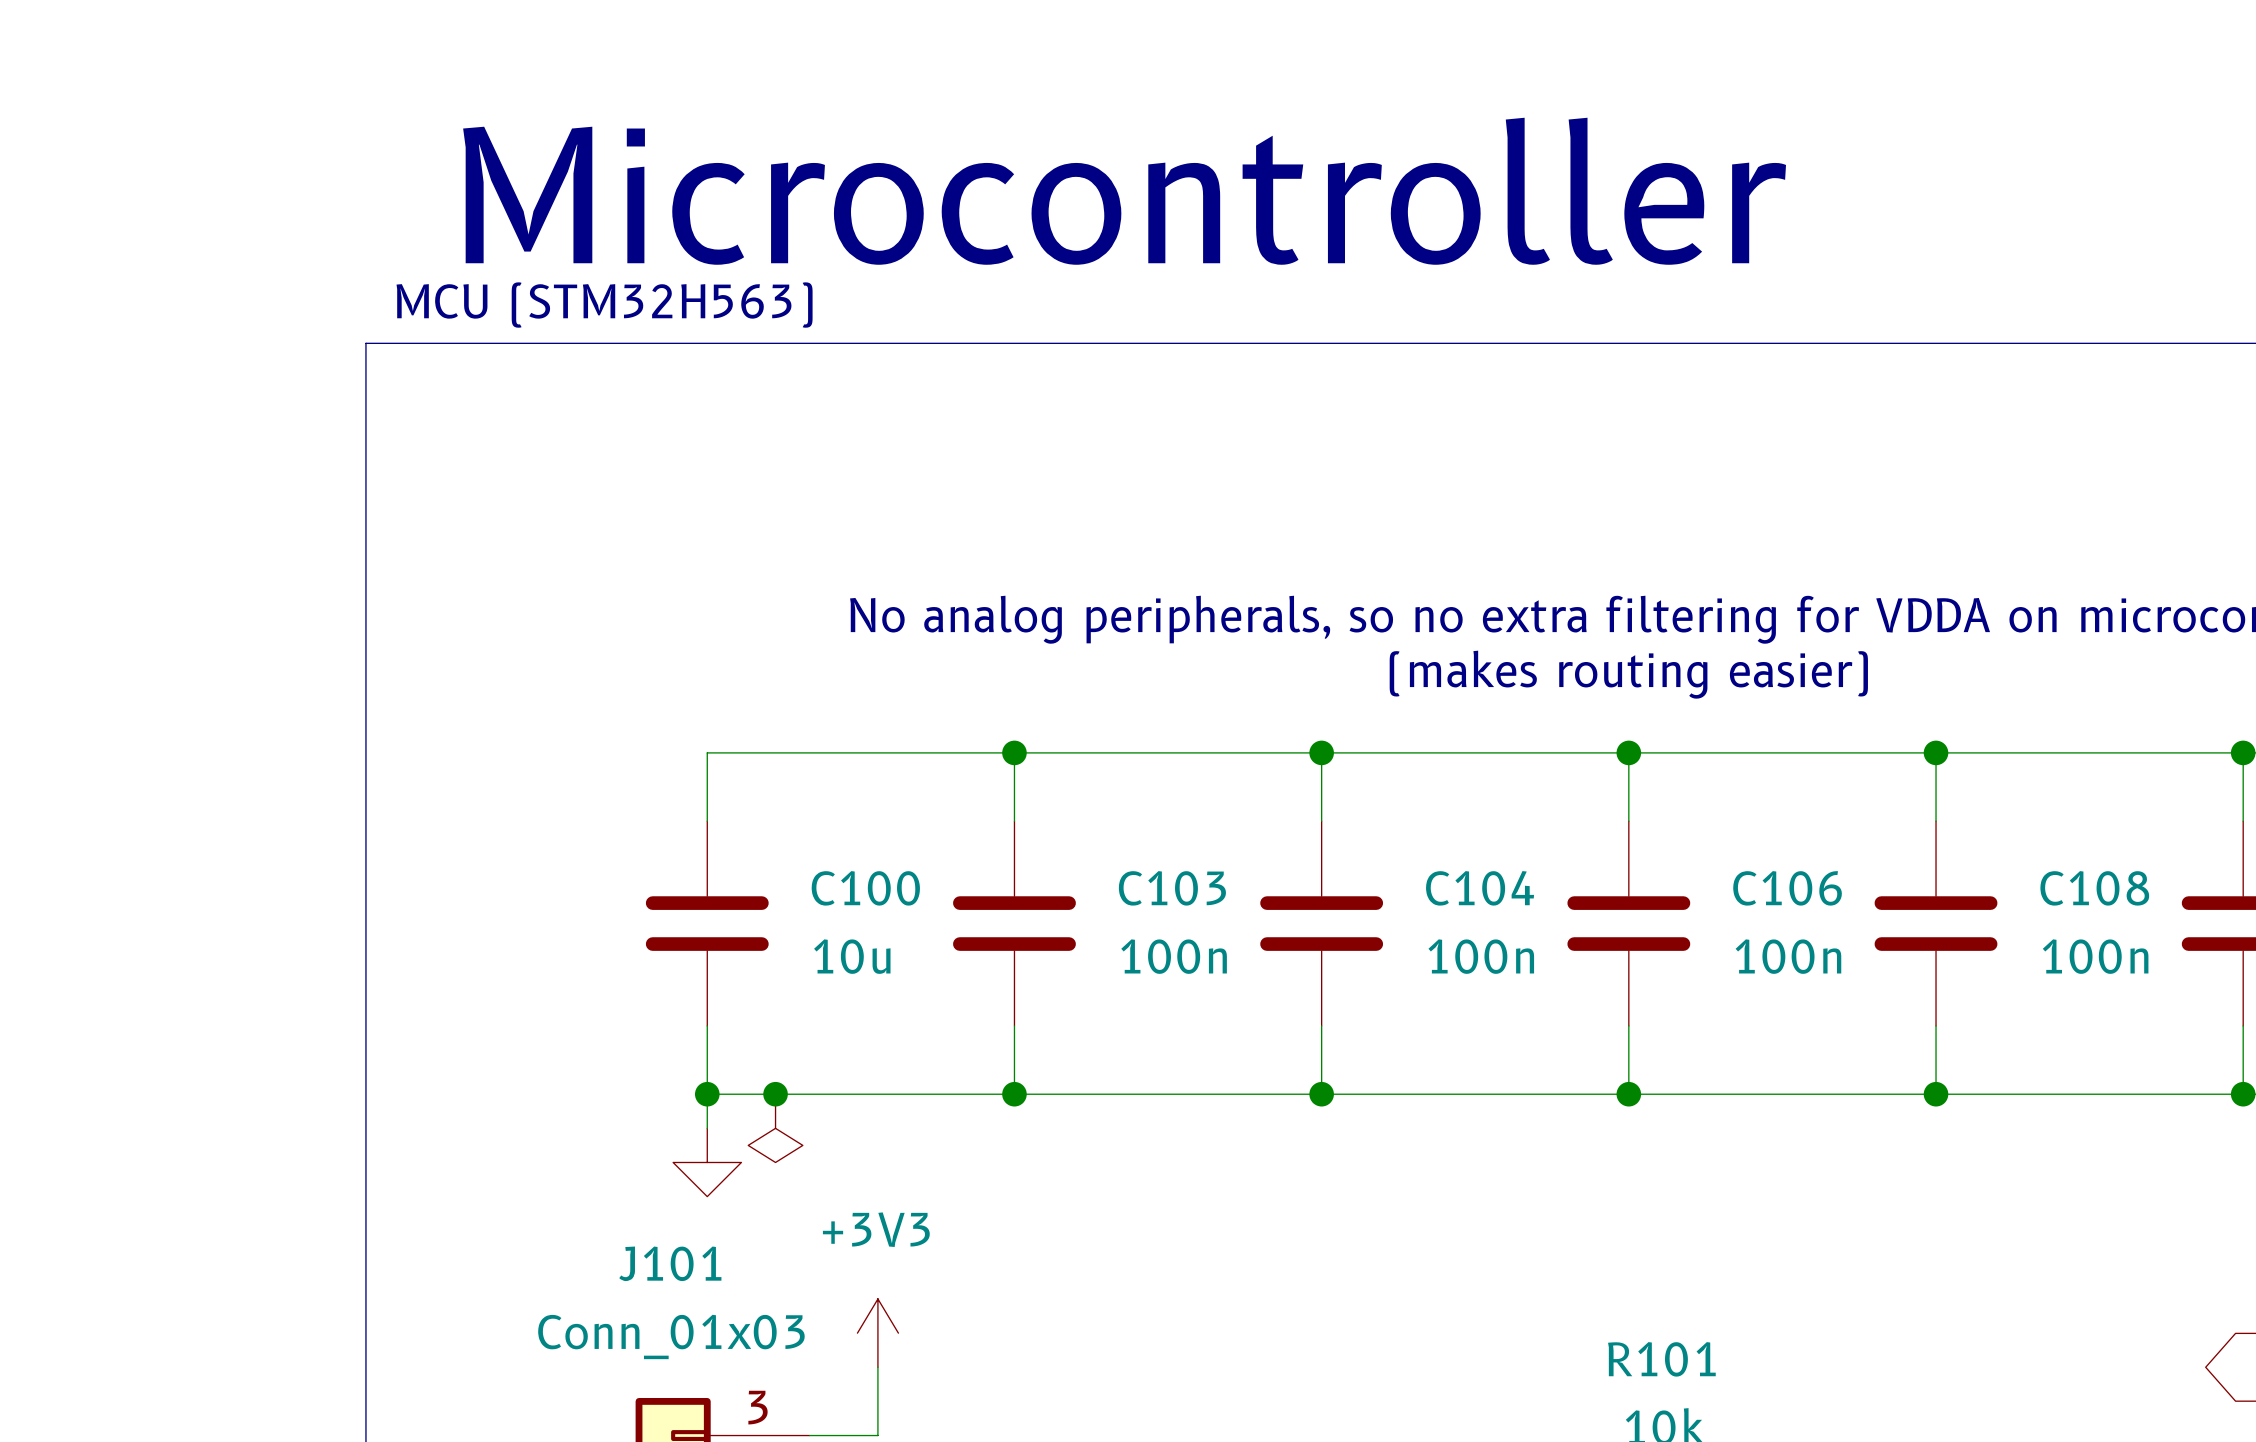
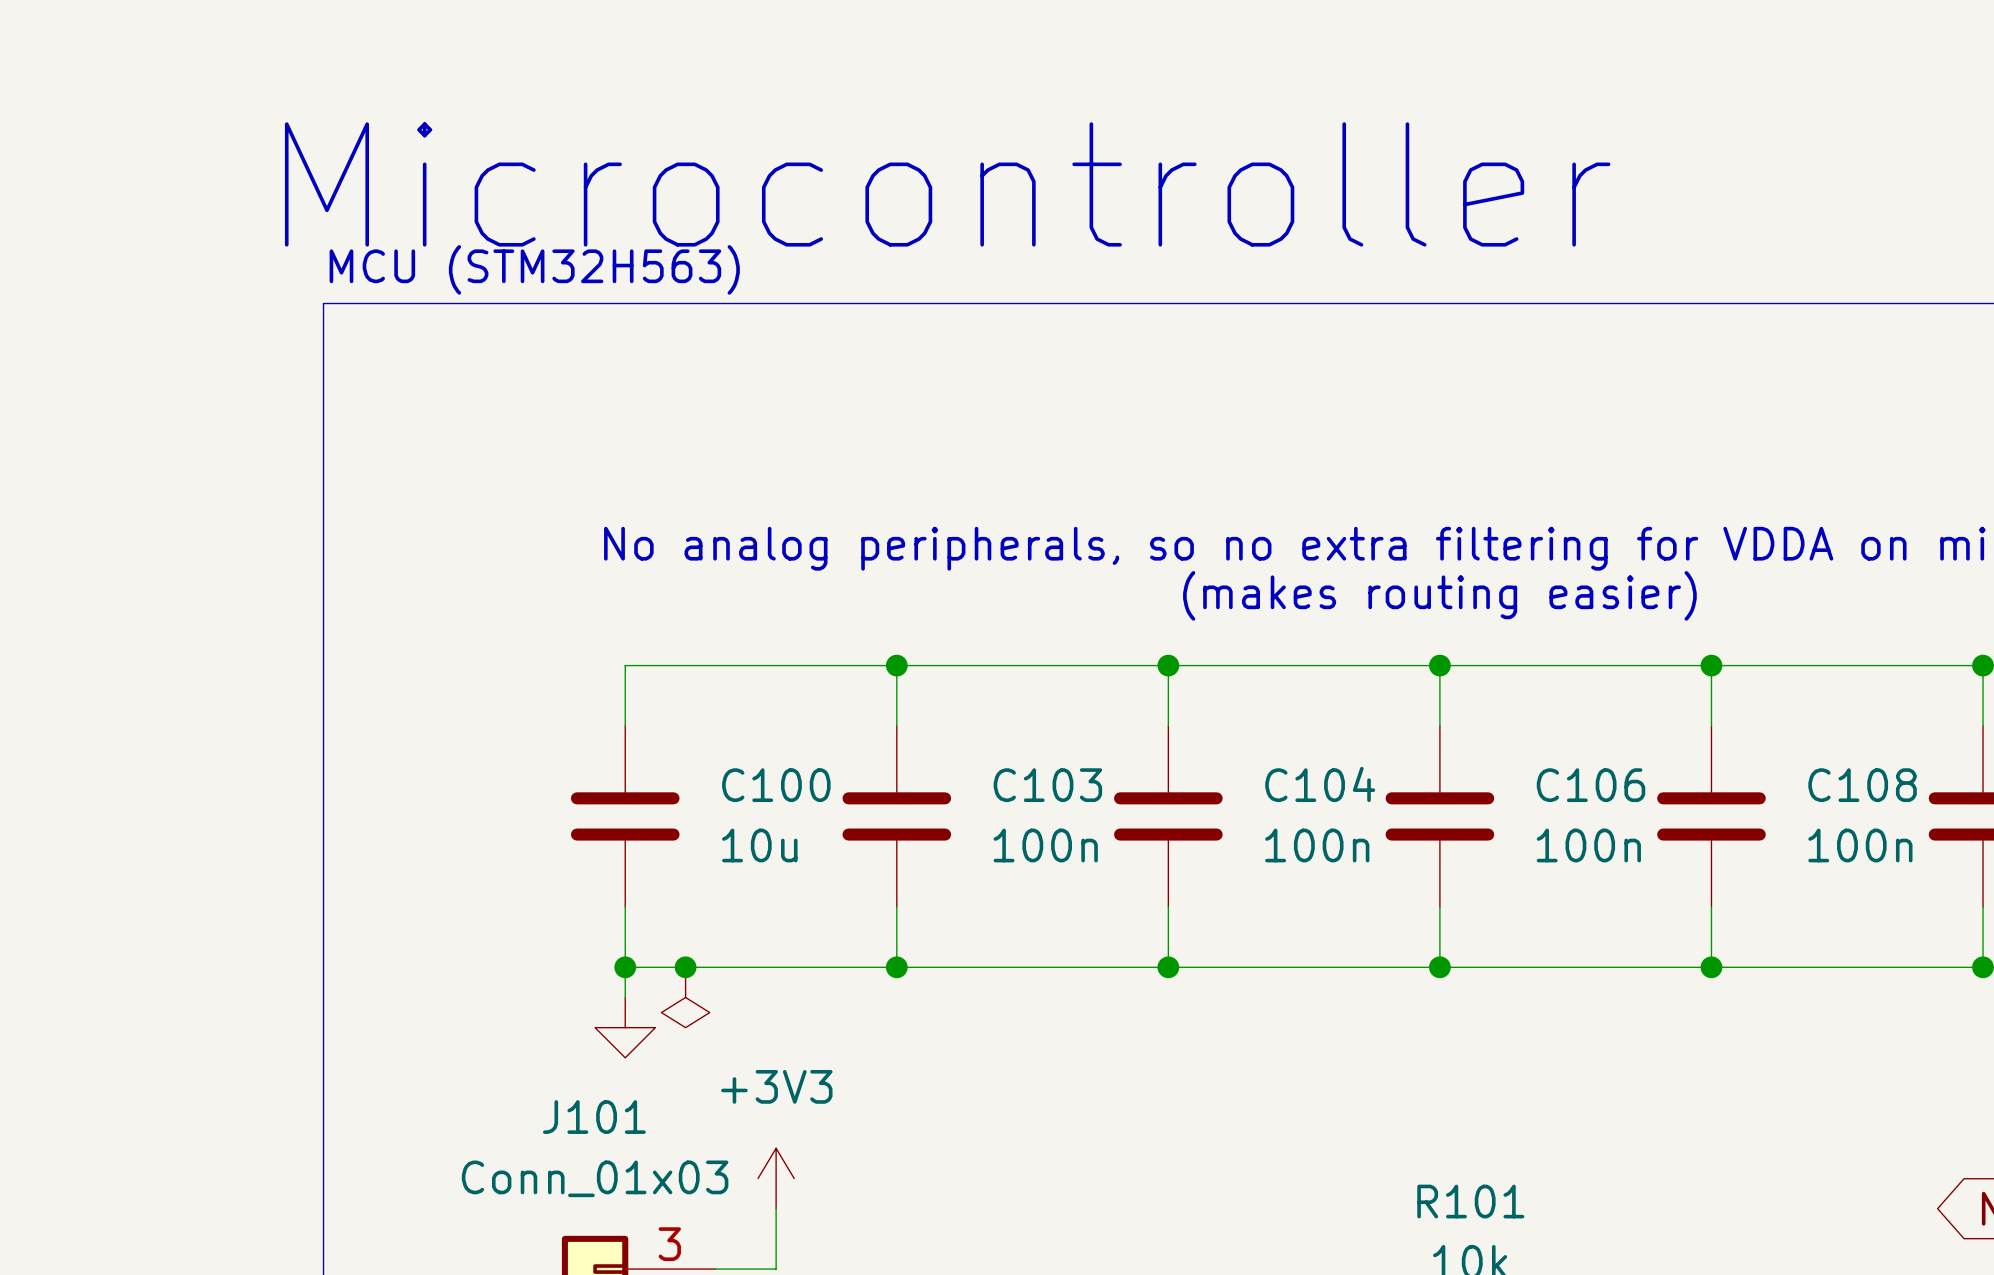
text position: Microcontroller (1124, 191) -> Microcontroller (947, 184)

